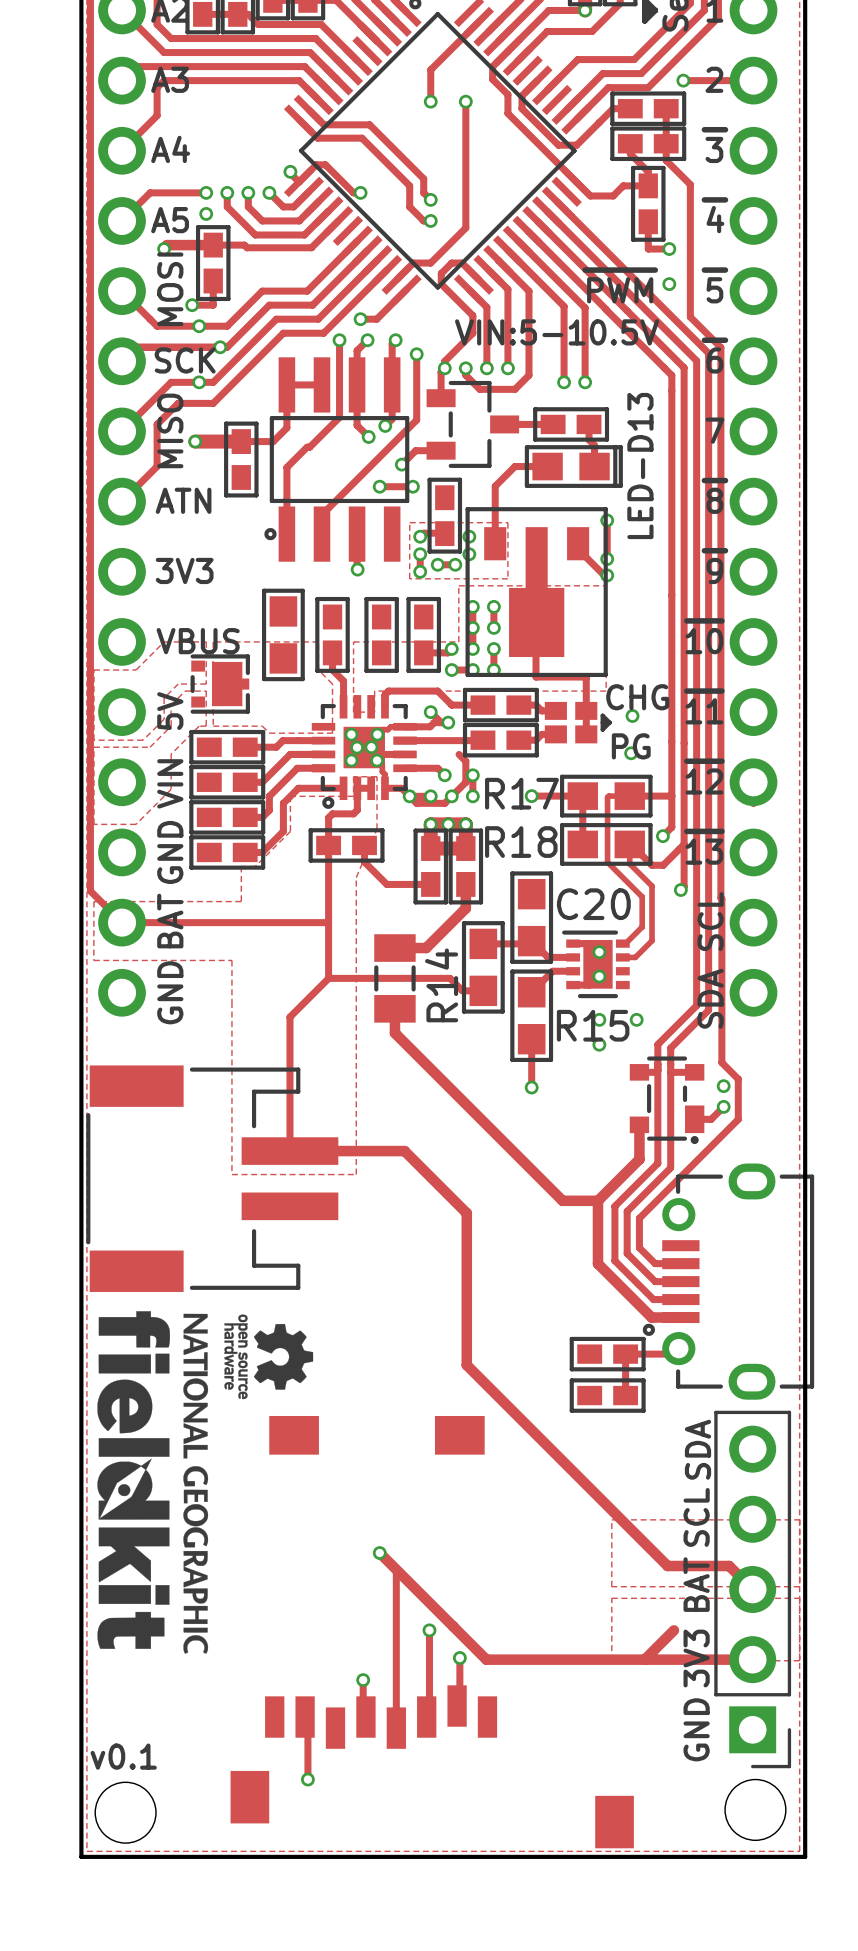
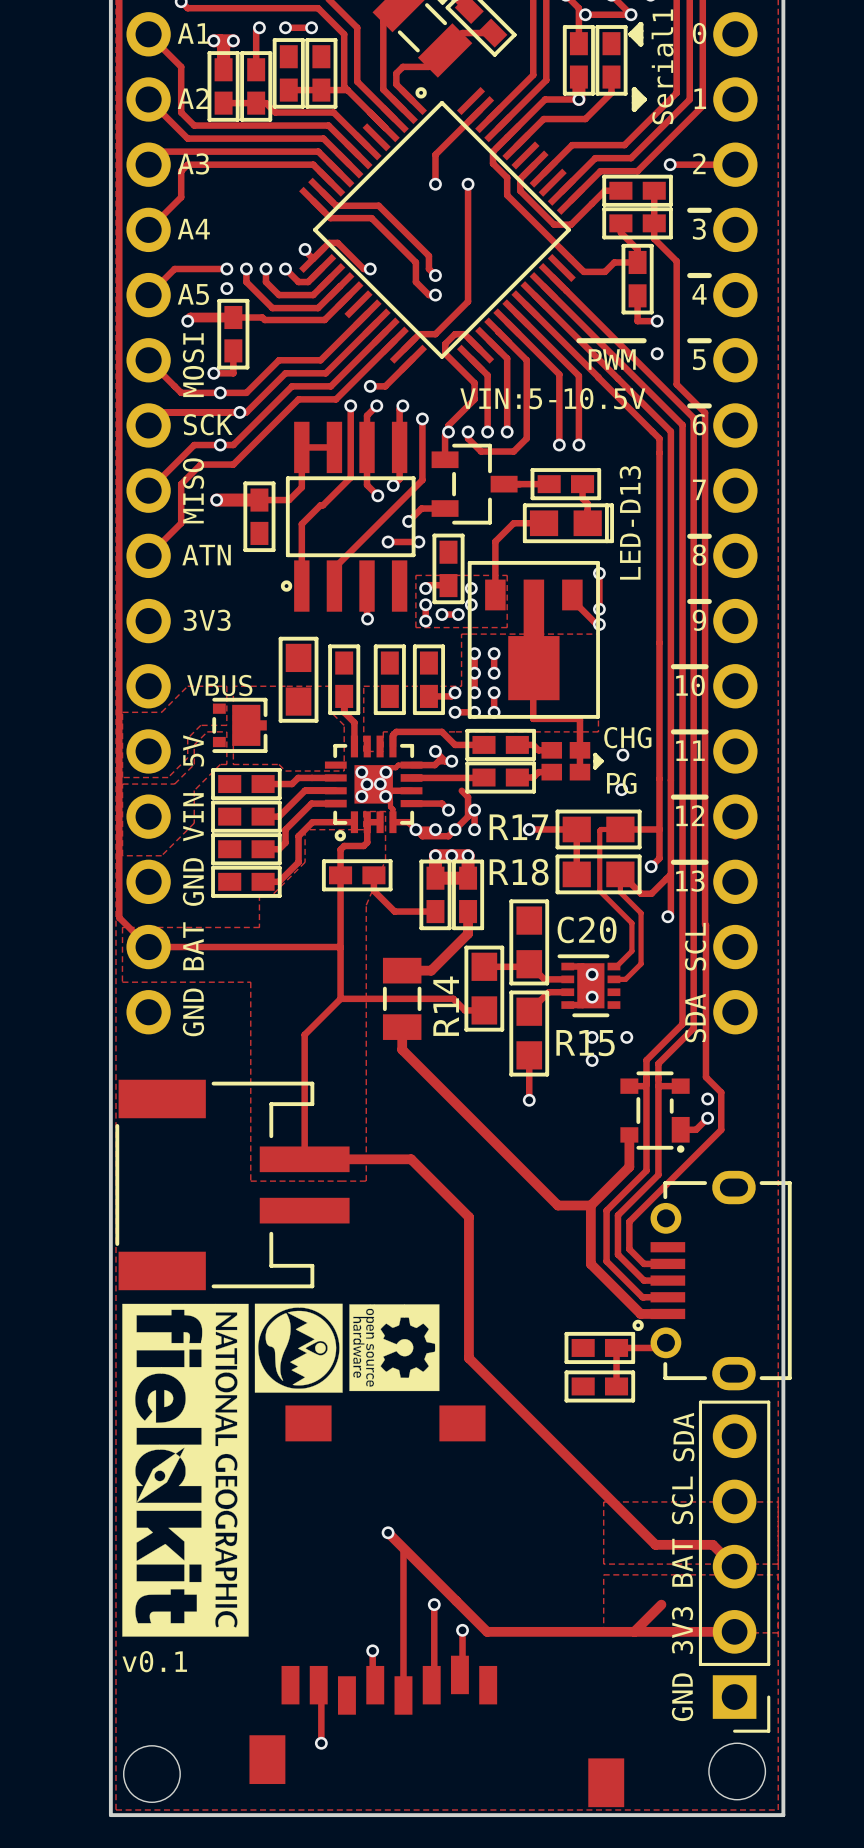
drawing: none -> [349, 1304, 440, 1392]
drawing shape: [97, 1311, 209, 1654] -> [122, 1303, 249, 1637]
drawing shape: [224, 1314, 314, 1400] -> [254, 1303, 343, 1393]
text position: v0.1 (123, 1756) -> v0.1 (154, 1661)

